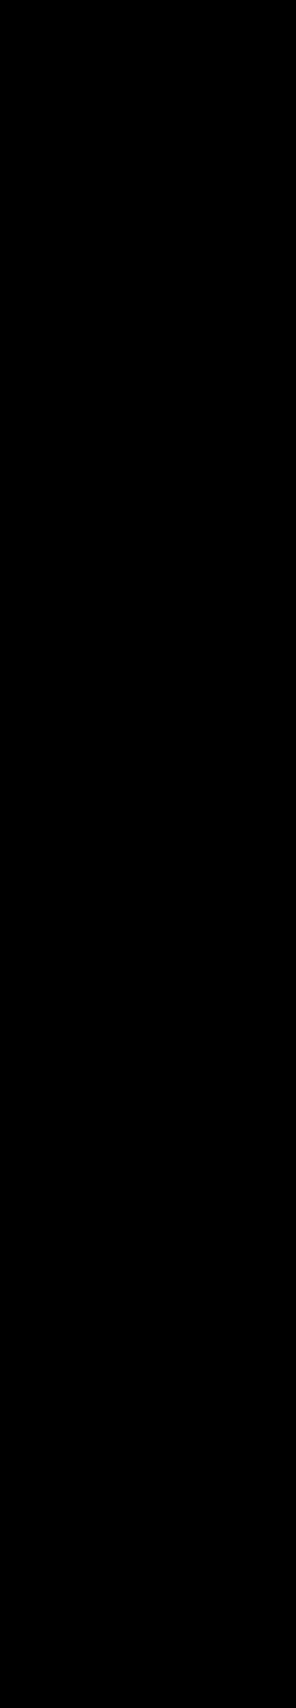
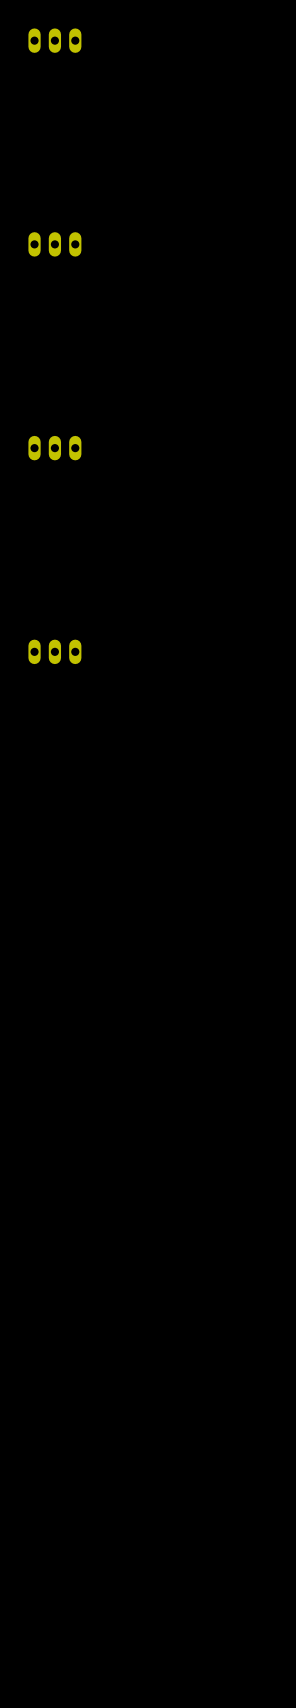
part: none -> (54, 40)
part: none -> (54, 244)
part: none -> (54, 448)
part: none -> (54, 651)

